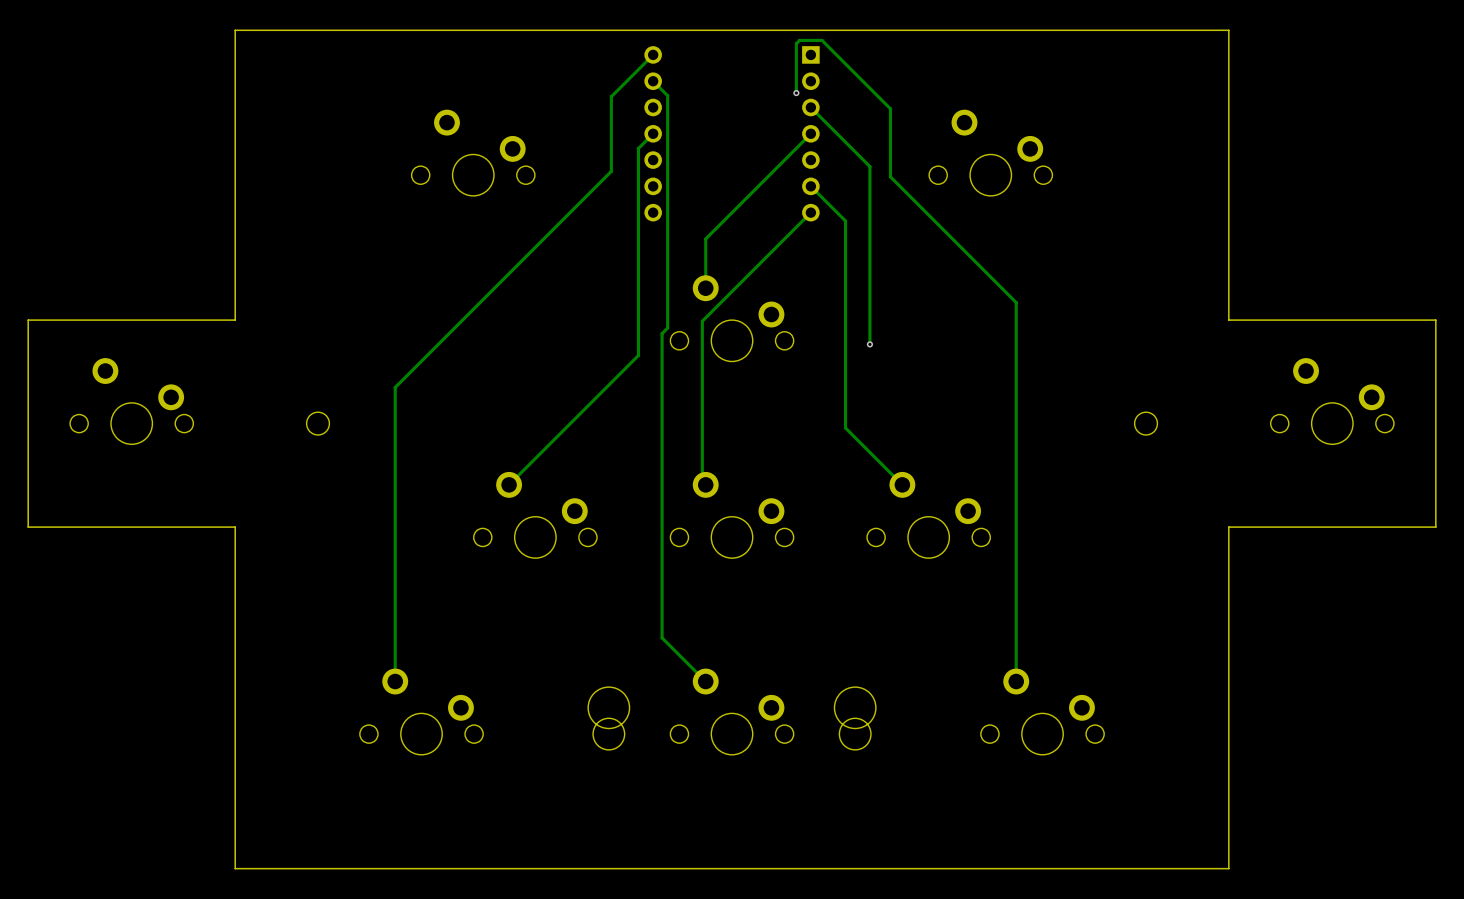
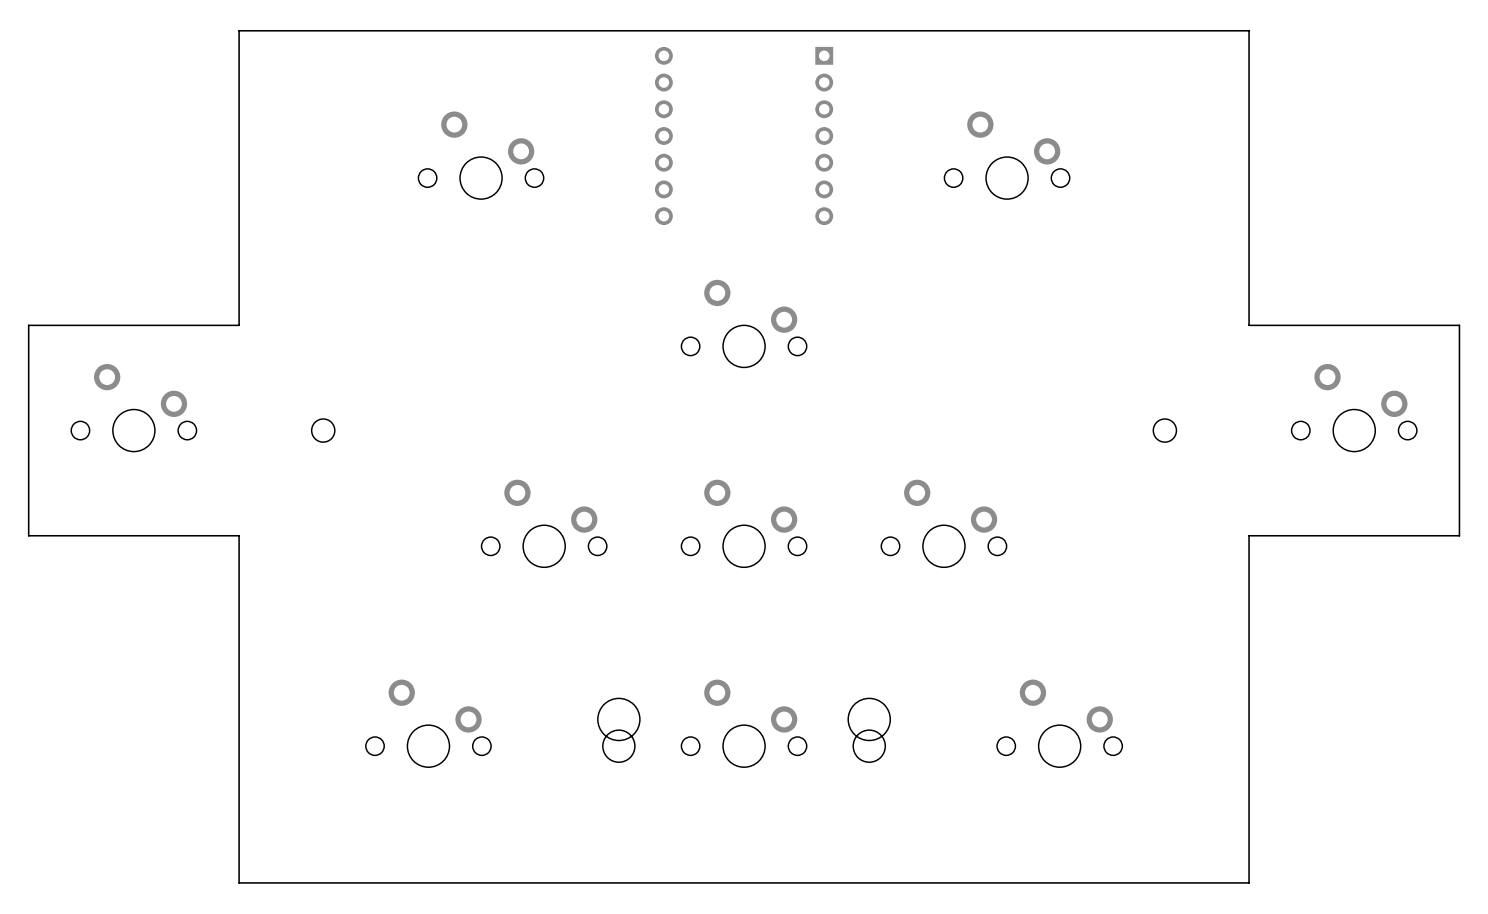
track: (653, 54) (611, 96) (611, 171) (395, 387) (395, 681) -> none
track: (653, 81) (667, 95) (667, 328) (662, 333) (662, 637) (705, 681) -> none
track: (796, 93) (796, 43) (799, 40) (822, 40) (890, 108) (890, 176) (1016, 302) (1016, 681) -> none
via: (796, 93) -> none
track: (810, 107) (869, 166) (869, 344) -> none
track: (653, 133) (638, 148) (638, 355) (509, 484) -> none
track: (810, 133) (705, 238) (705, 288) -> none
track: (810, 186) (845, 221) (845, 428) (902, 484) -> none
track: (810, 212) (702, 321) (702, 481) (705, 484) -> none
via: (869, 344) -> none

